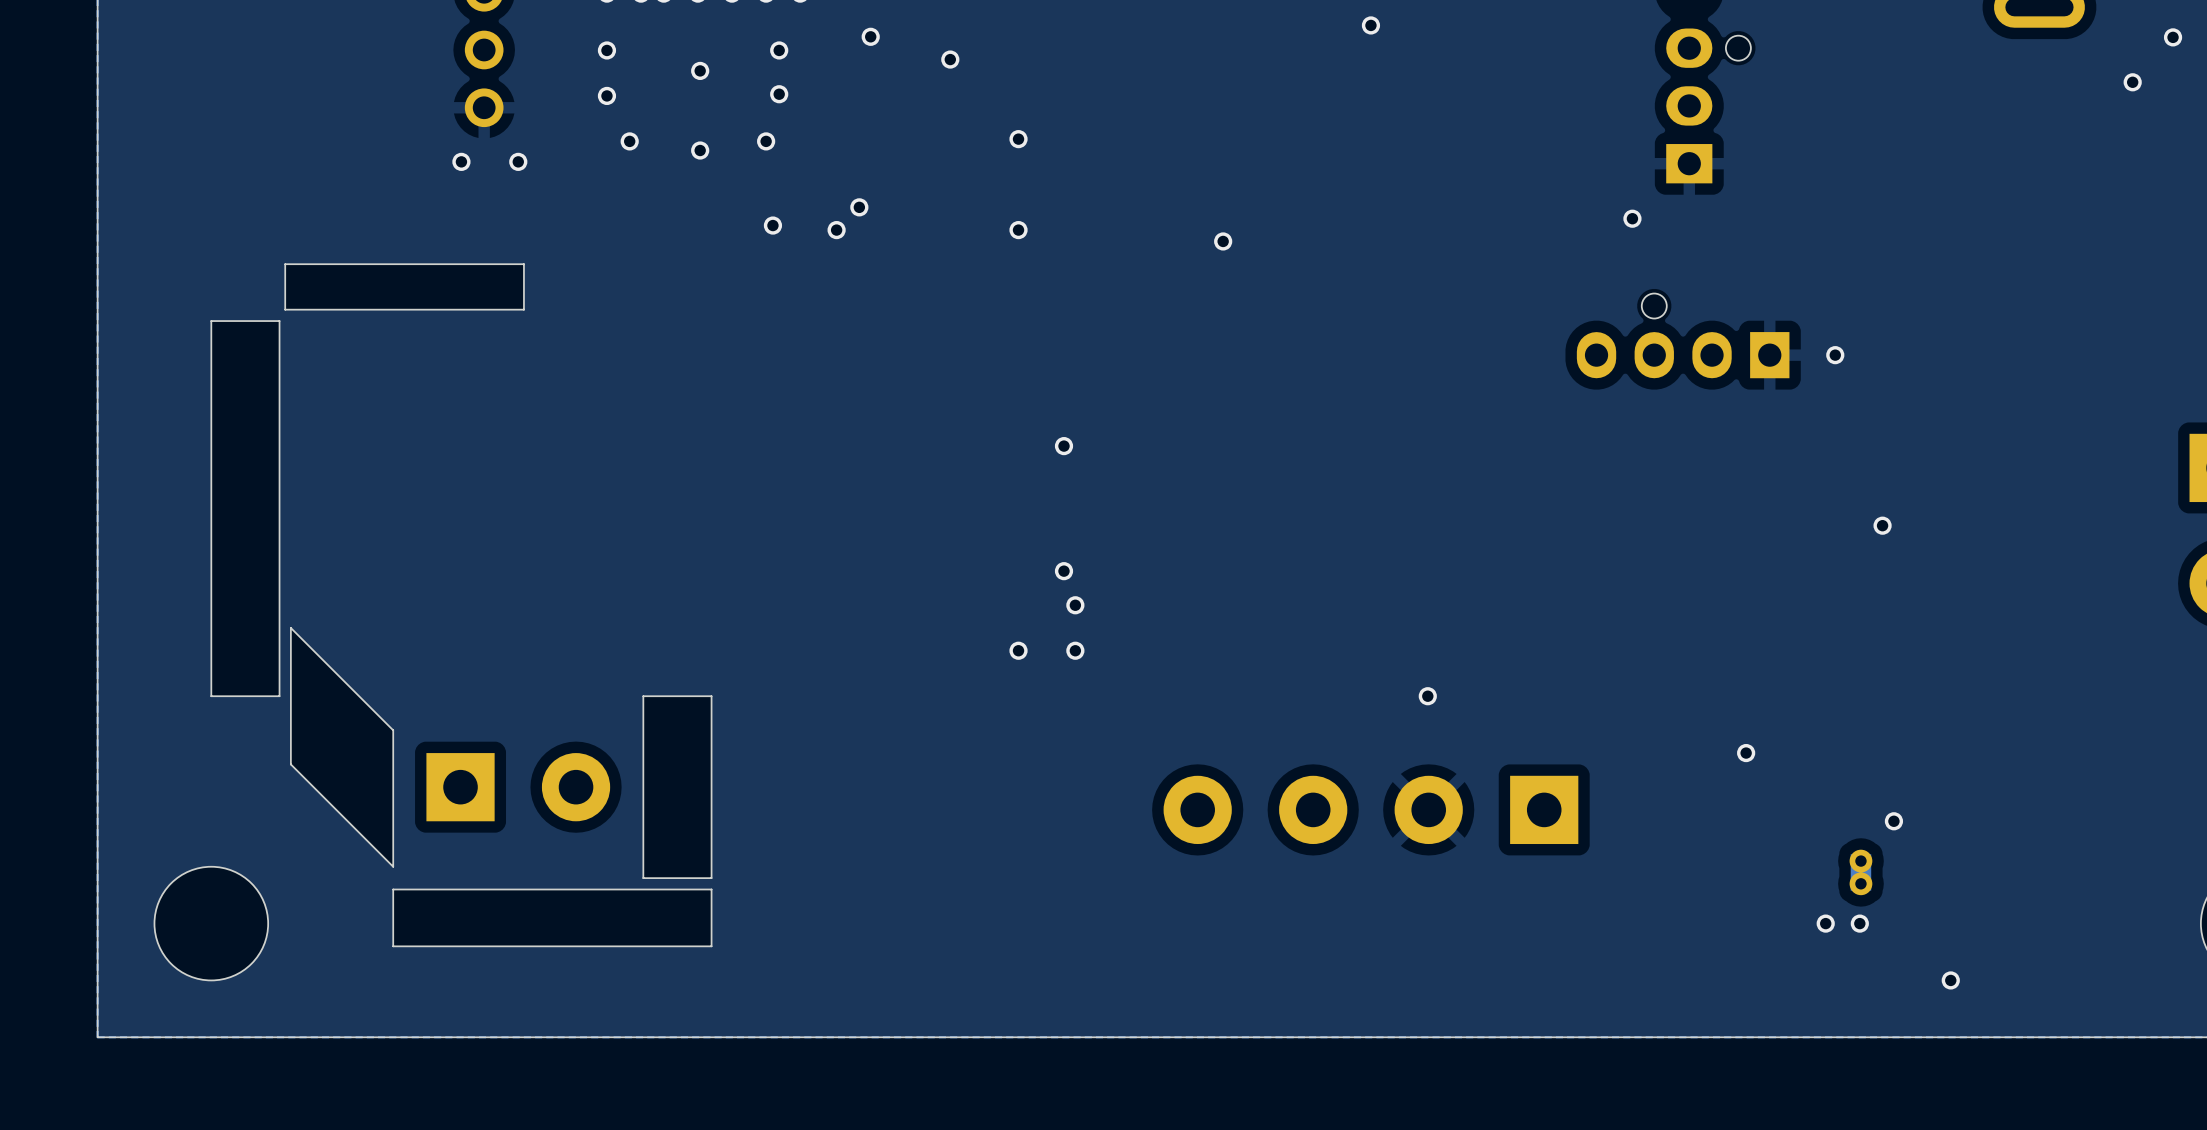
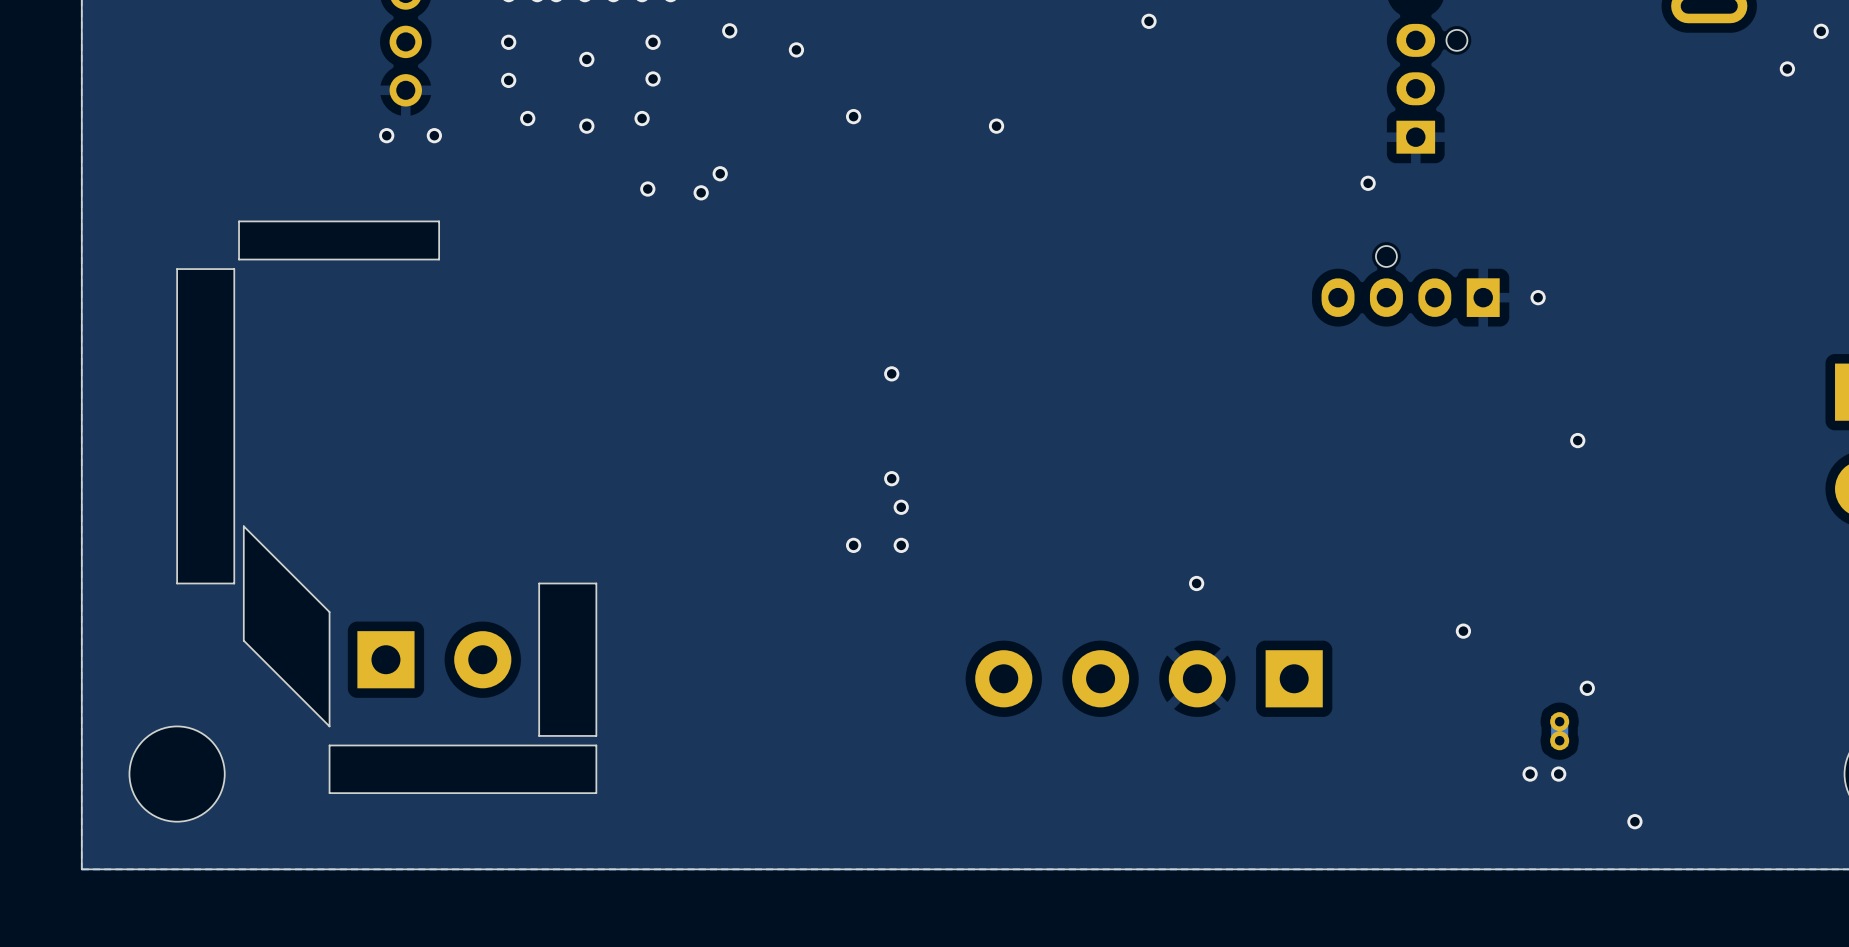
via: none -> (996, 126)
via: (1018, 230) -> none
via: (1223, 241) -> none

